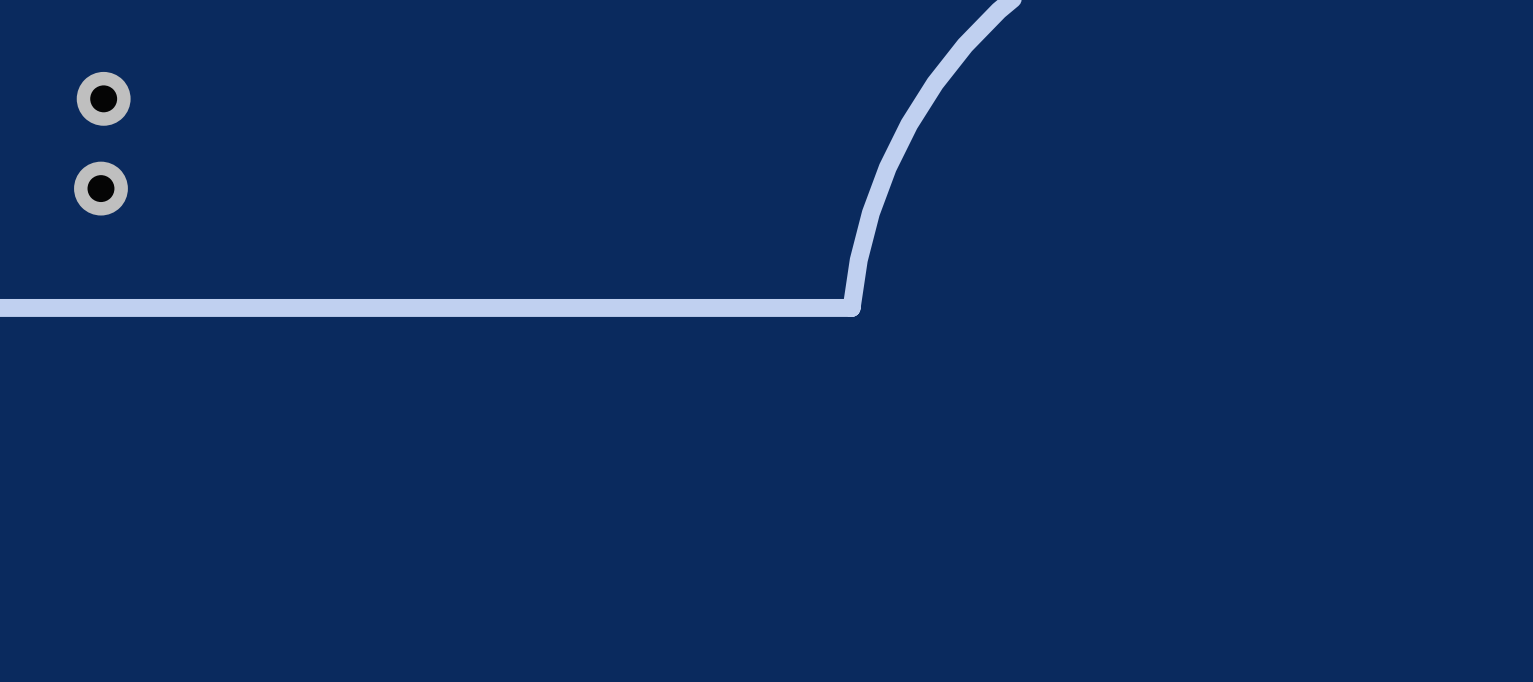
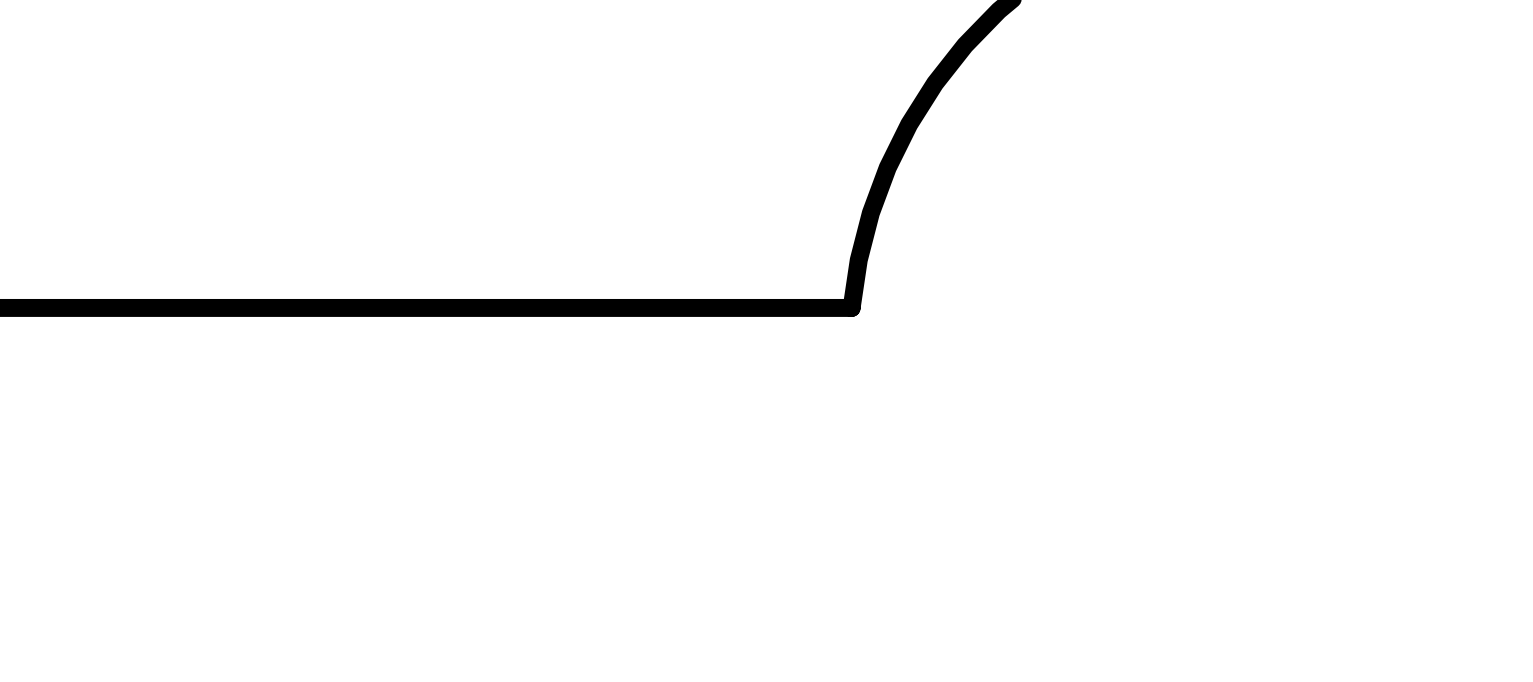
via: (103, 98) -> none
via: (100, 188) -> none

